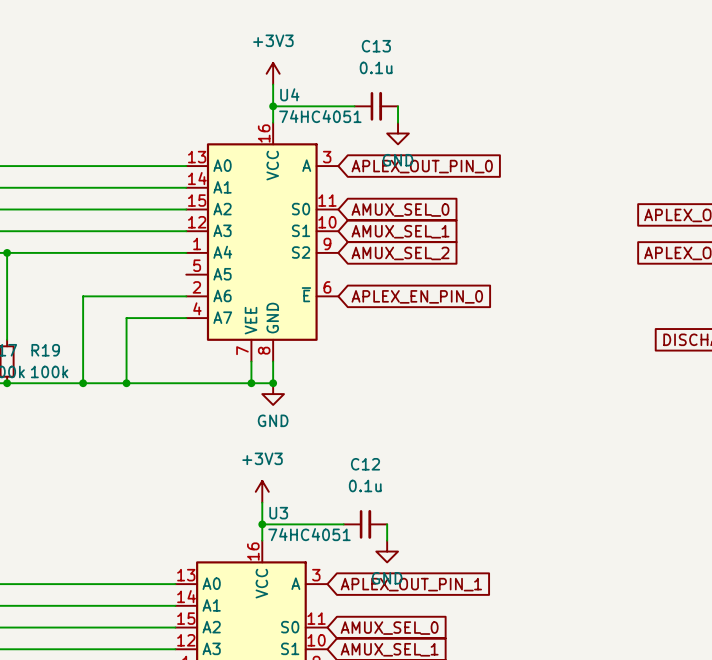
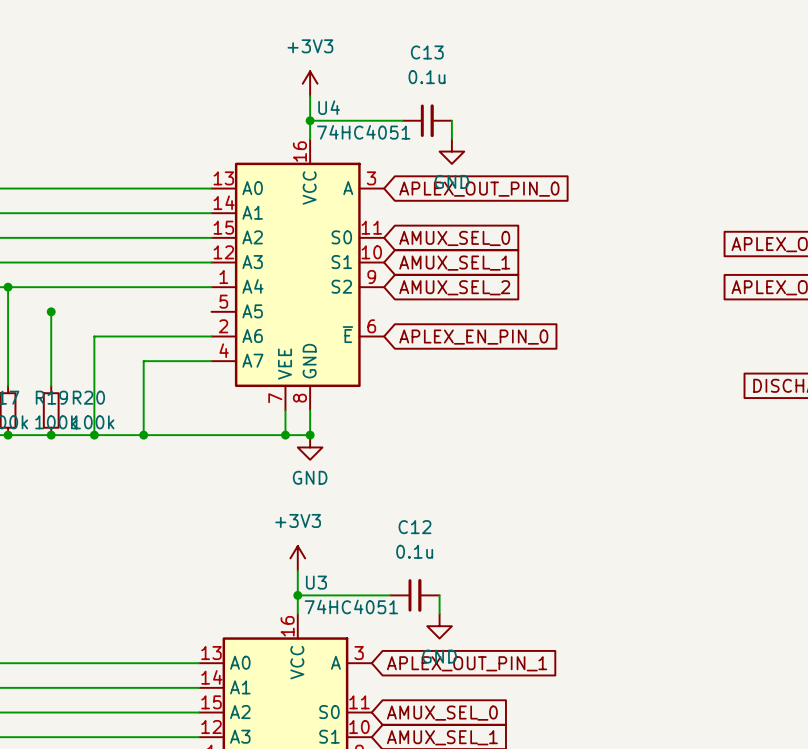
wire: none -> (51, 311) (51, 385)
junction: none -> (51, 311)
R20: none -> 100k (51, 410)
junction: none -> (51, 435)

